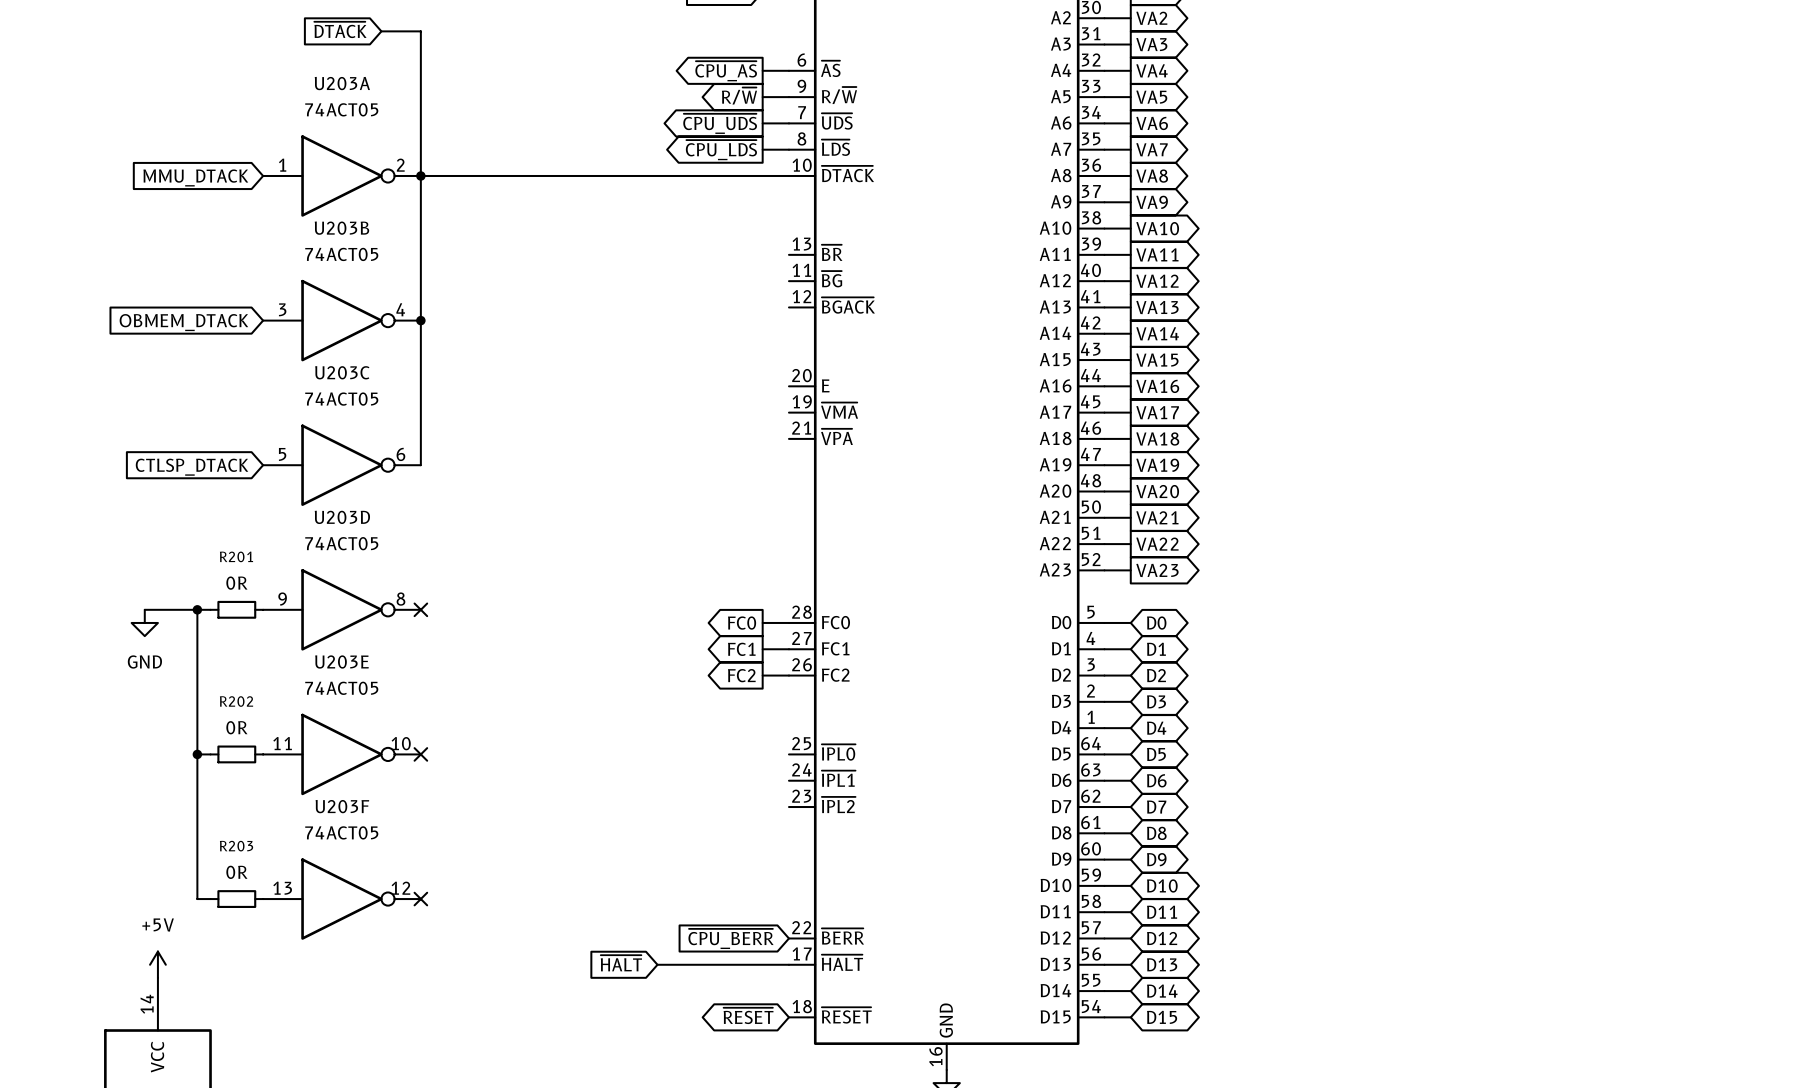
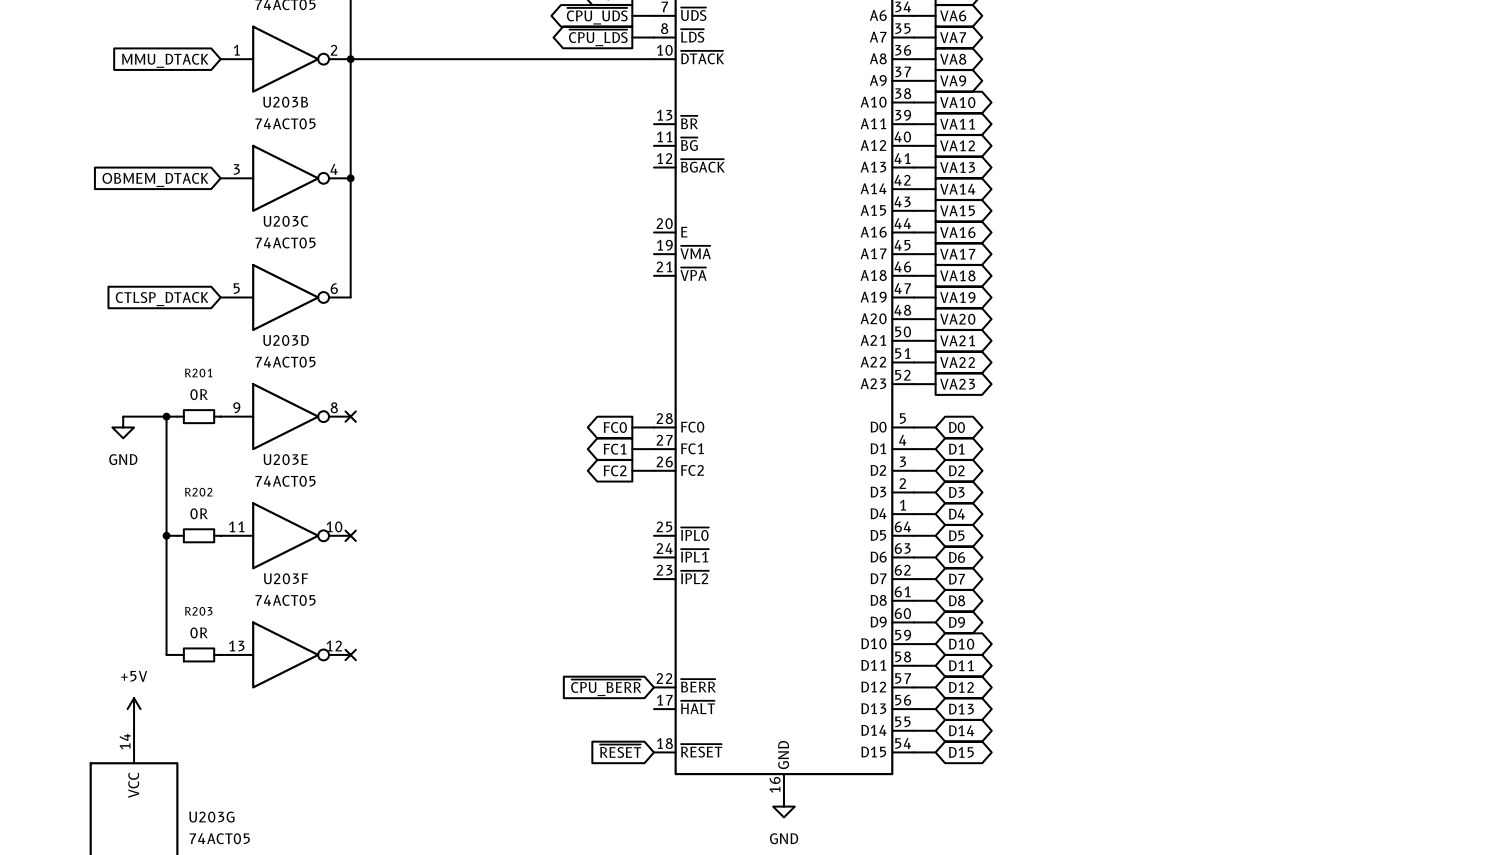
global label: ~{HALT} (621, 963) -> none
wire: (657, 964) (788, 964) -> none
global label shape: bidirectional (748, 1015) -> input (620, 751)

